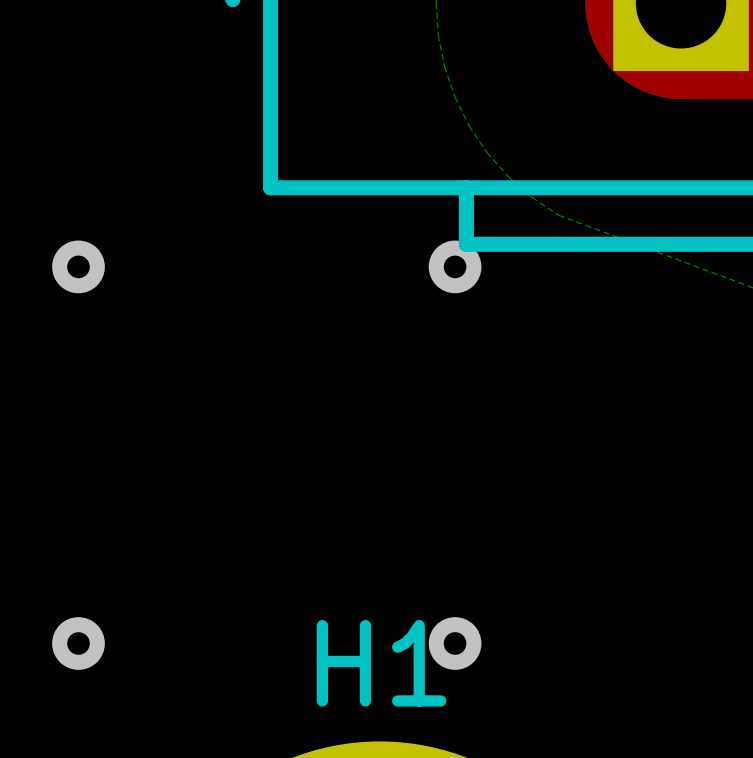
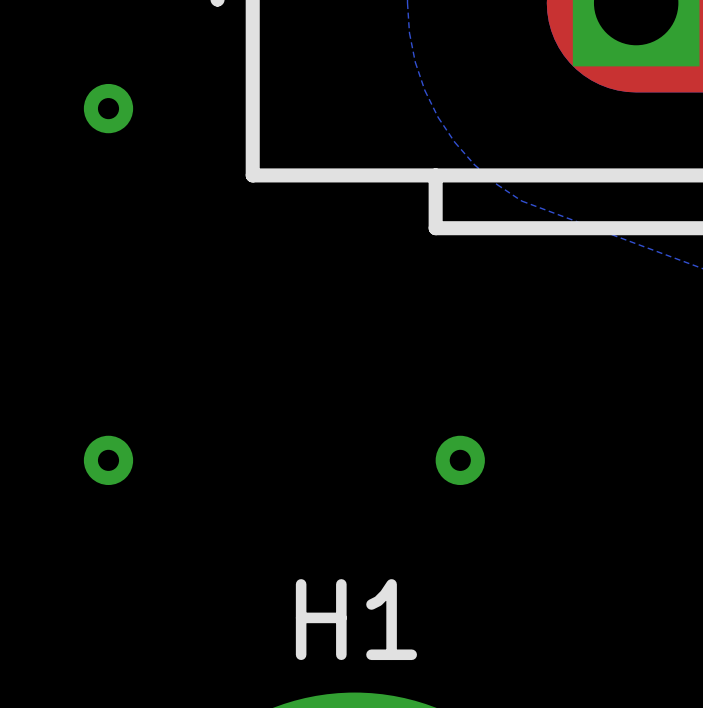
via: none -> (108, 108)
via: (78, 266) -> none
via: (455, 266) -> none
via: none -> (108, 460)
via: none -> (460, 460)
via: (78, 643) -> none
via: (455, 643) -> none

